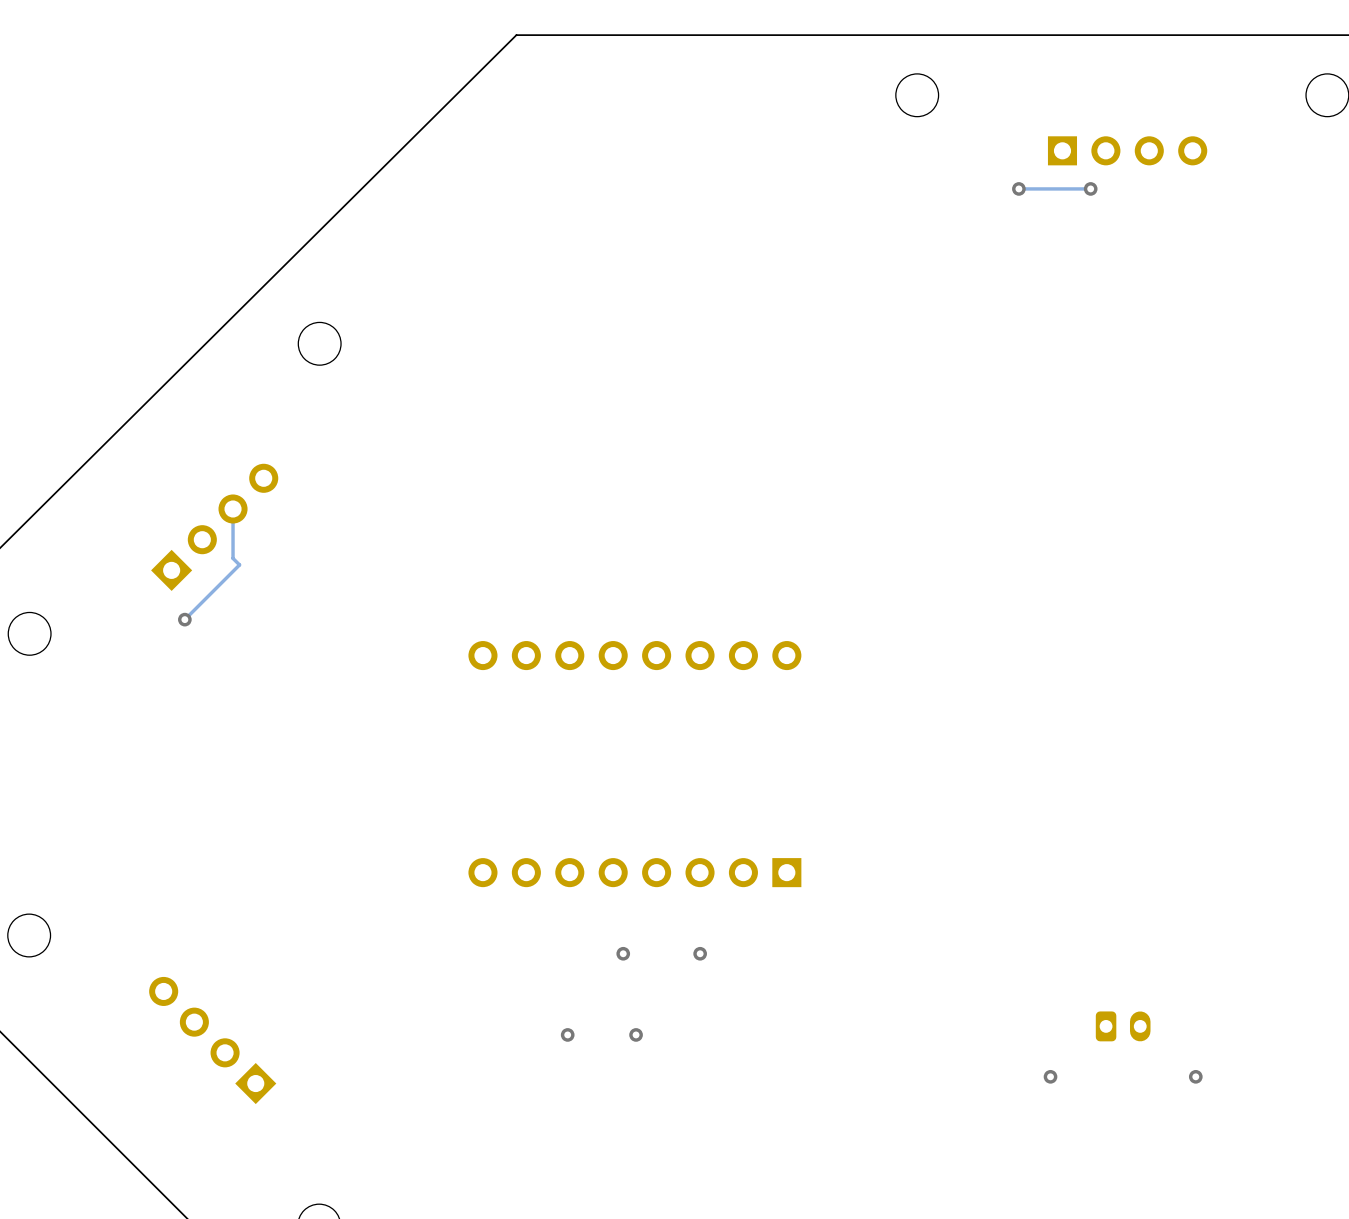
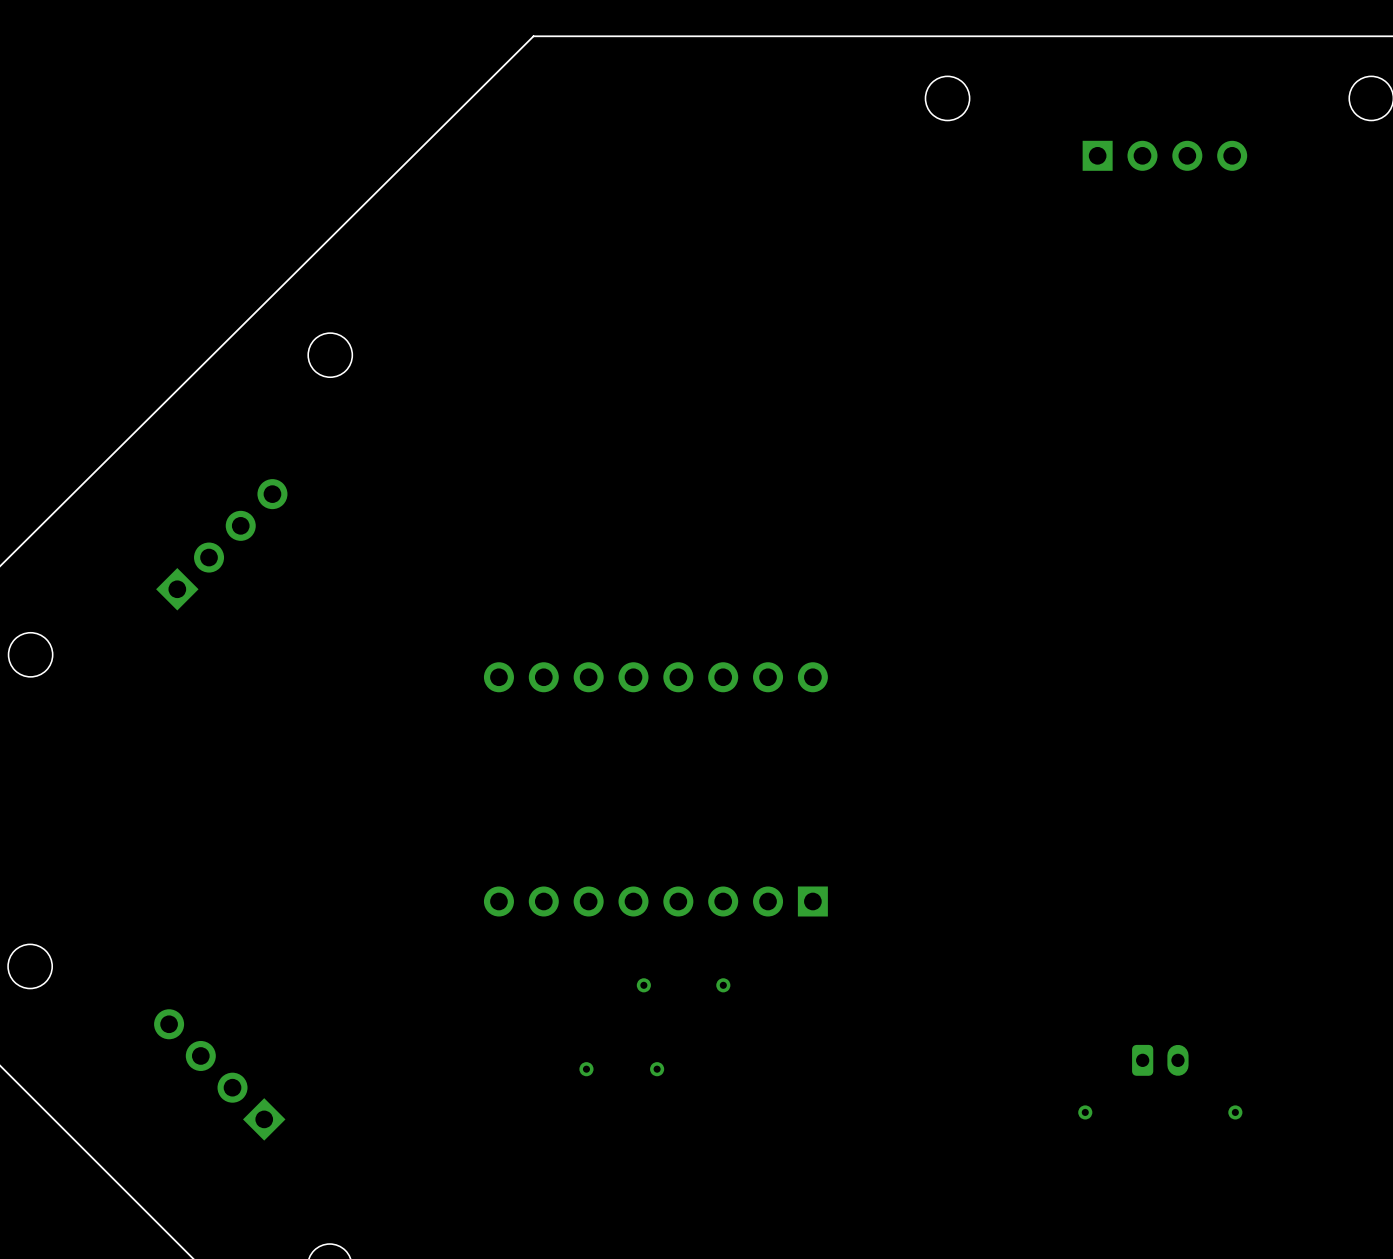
via: (1018, 188) -> none
track: (1090, 188) (1018, 188) -> none
via: (1090, 188) -> none
track: (233, 508) (233, 558) (239, 564) (184, 619) -> none
via: (184, 619) -> none

